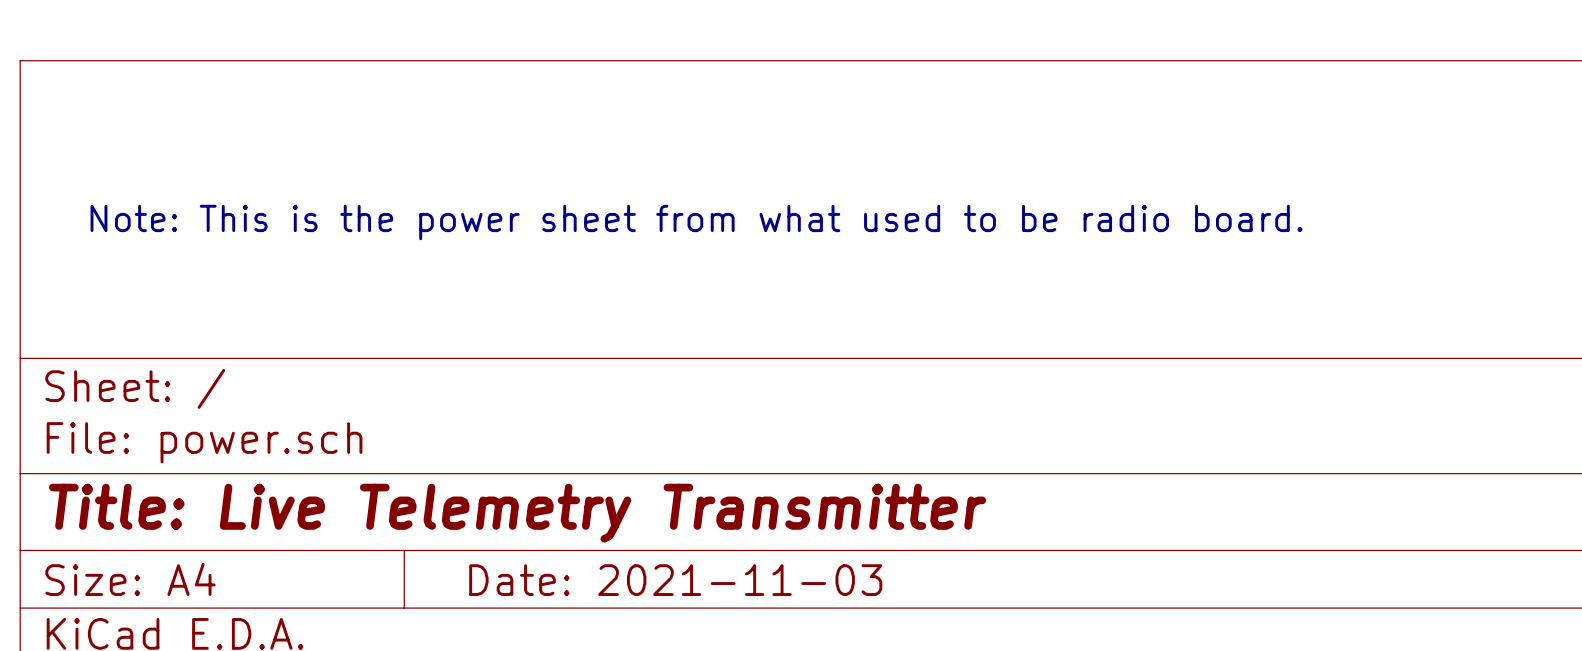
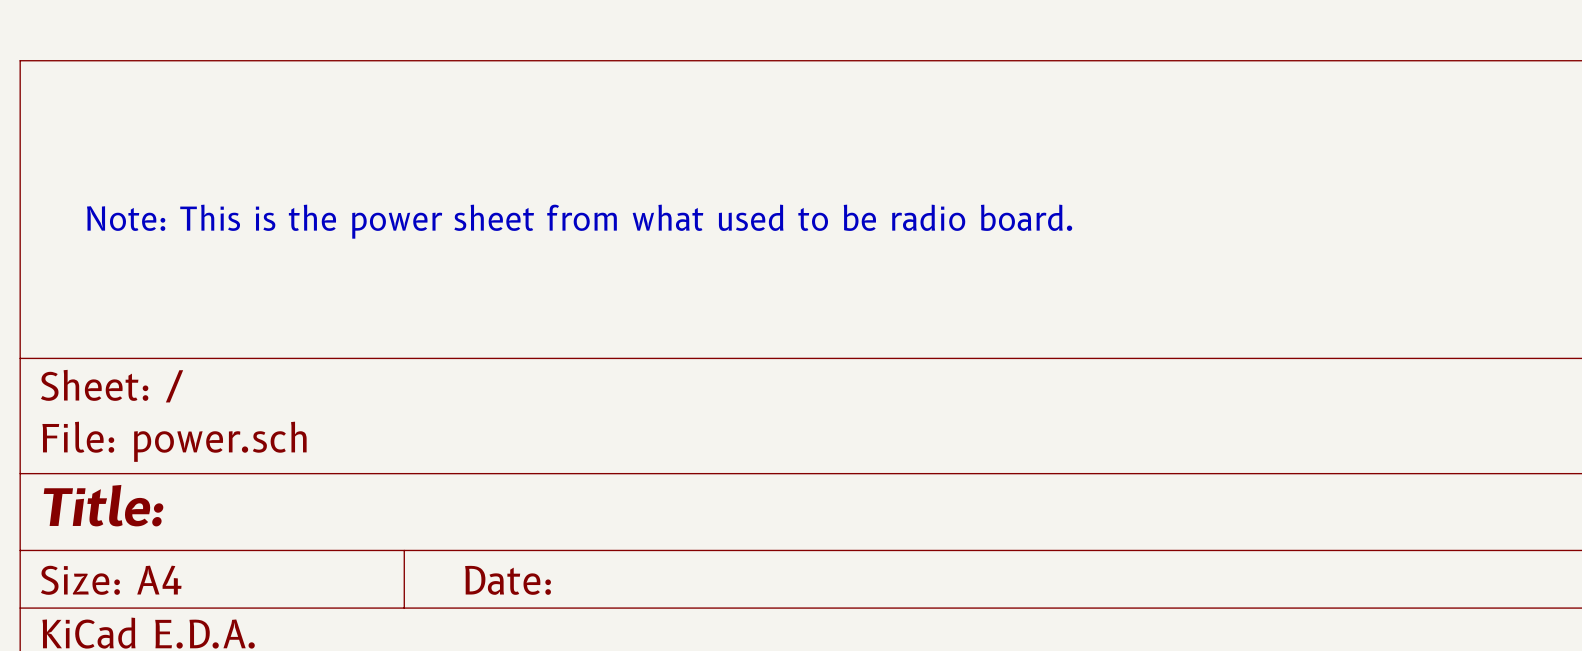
title block: Title: Live Telemetry Transmitter (517, 513) -> Title: (103, 505)
title block: Date: 2021-11-03 (675, 580) -> Date: (508, 580)

